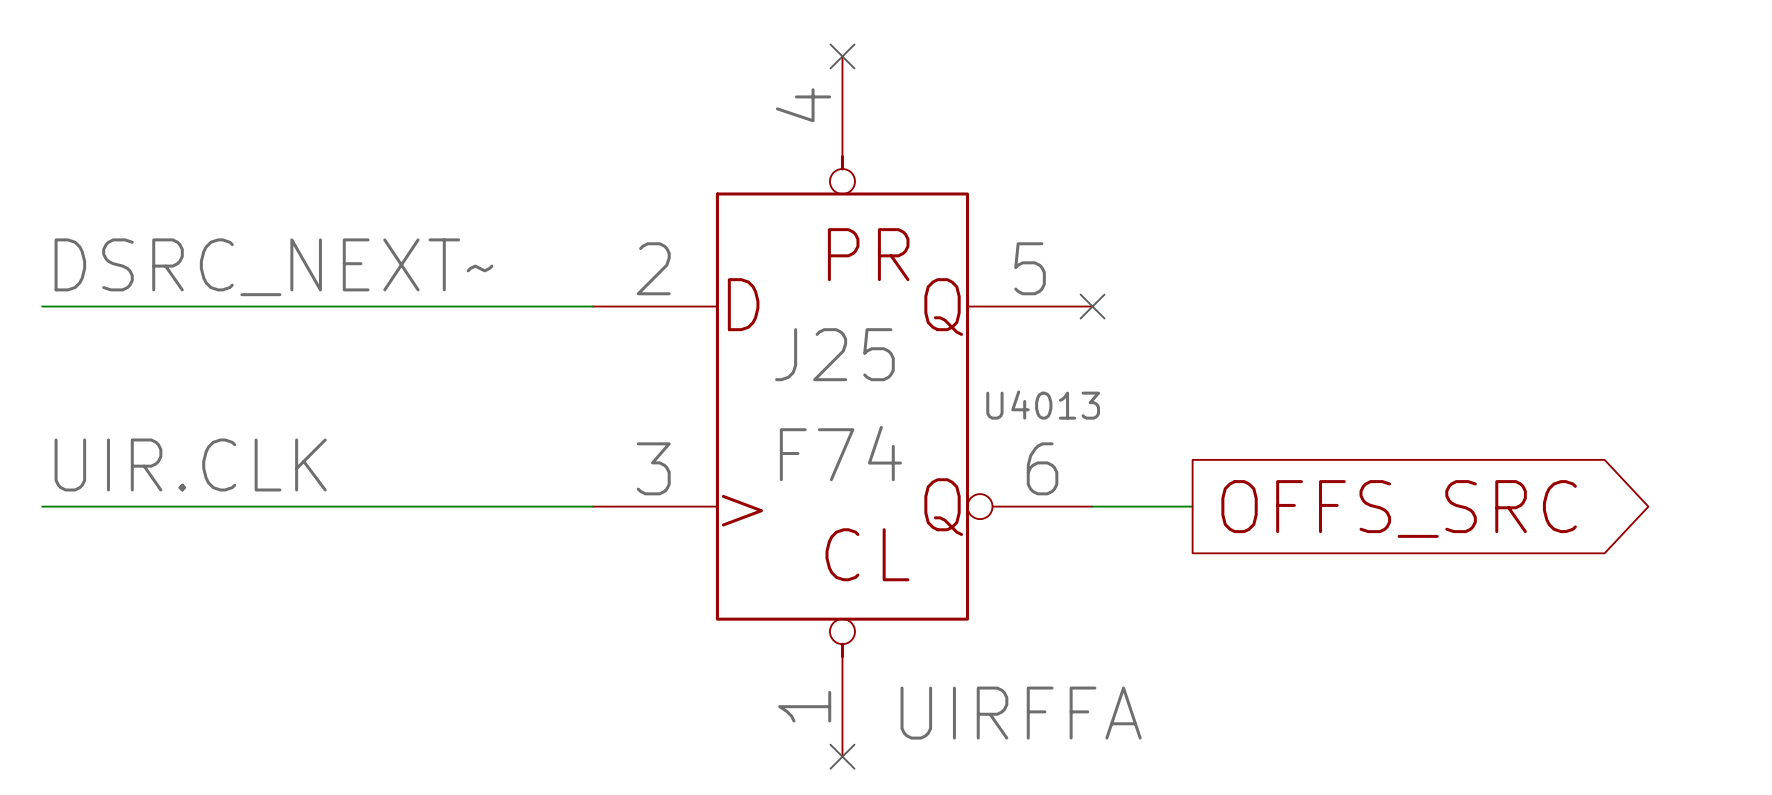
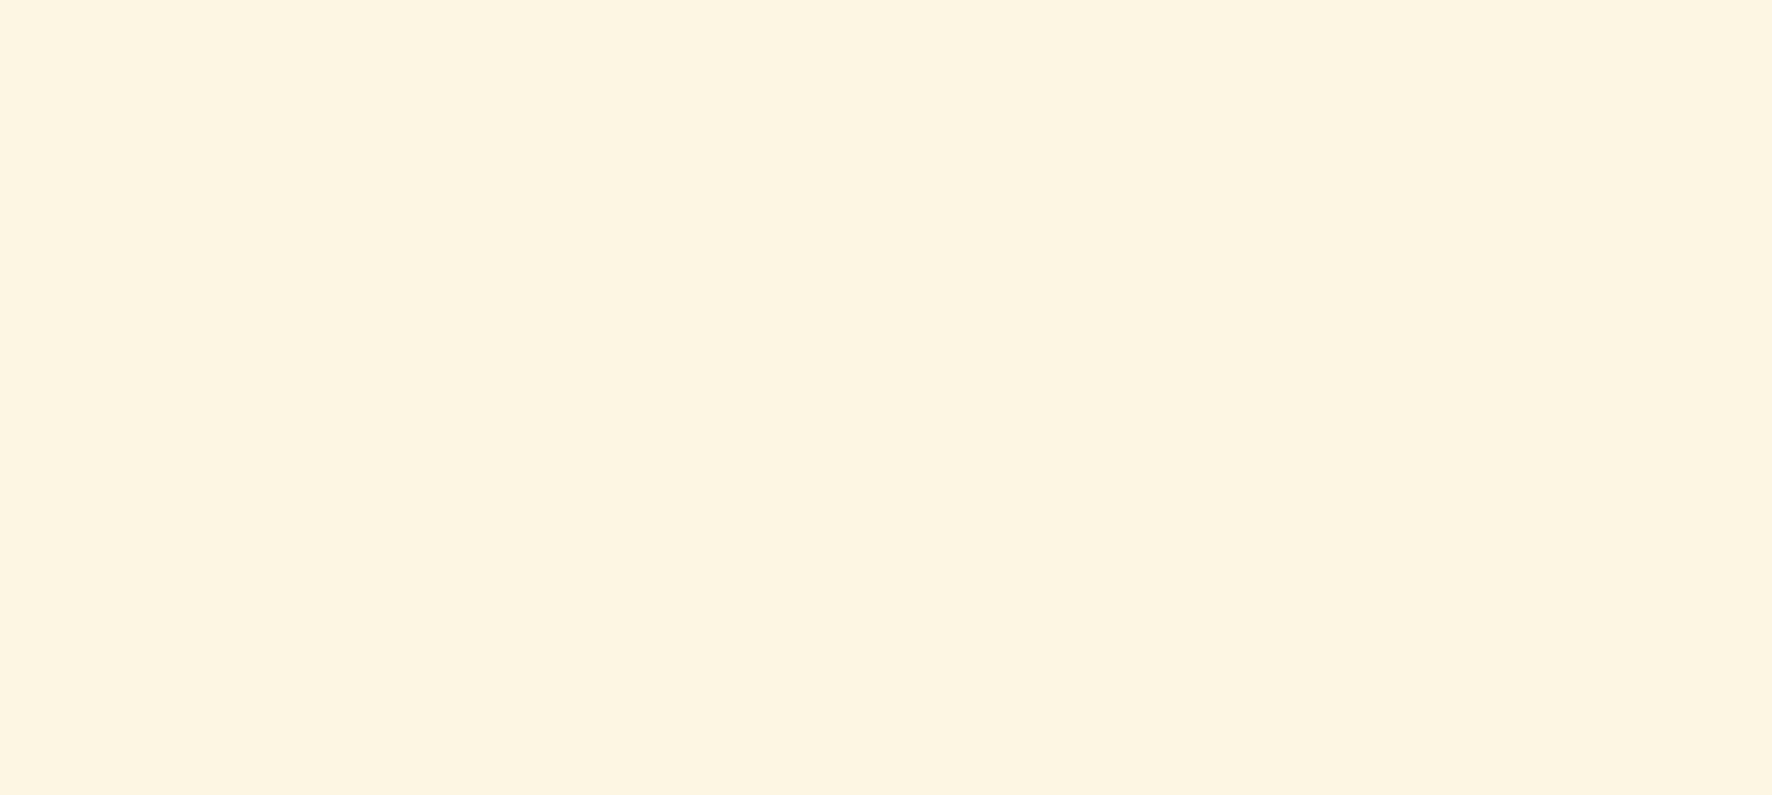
no-connect mark: (842, 56) -> none
label: DSRC_NEXT~ (274, 267) -> none
wire: (42, 306) (592, 306) -> none
no-connect mark: (1092, 306) -> none
U4013: F74 (842, 406) -> none
label: UIR.CLK (190, 464) -> none
wire: (42, 506) (592, 506) -> none
wire: (1092, 506) (1192, 506) -> none
global label: OFFS_SRC (1399, 508) -> none
no-connect mark: (842, 756) -> none

